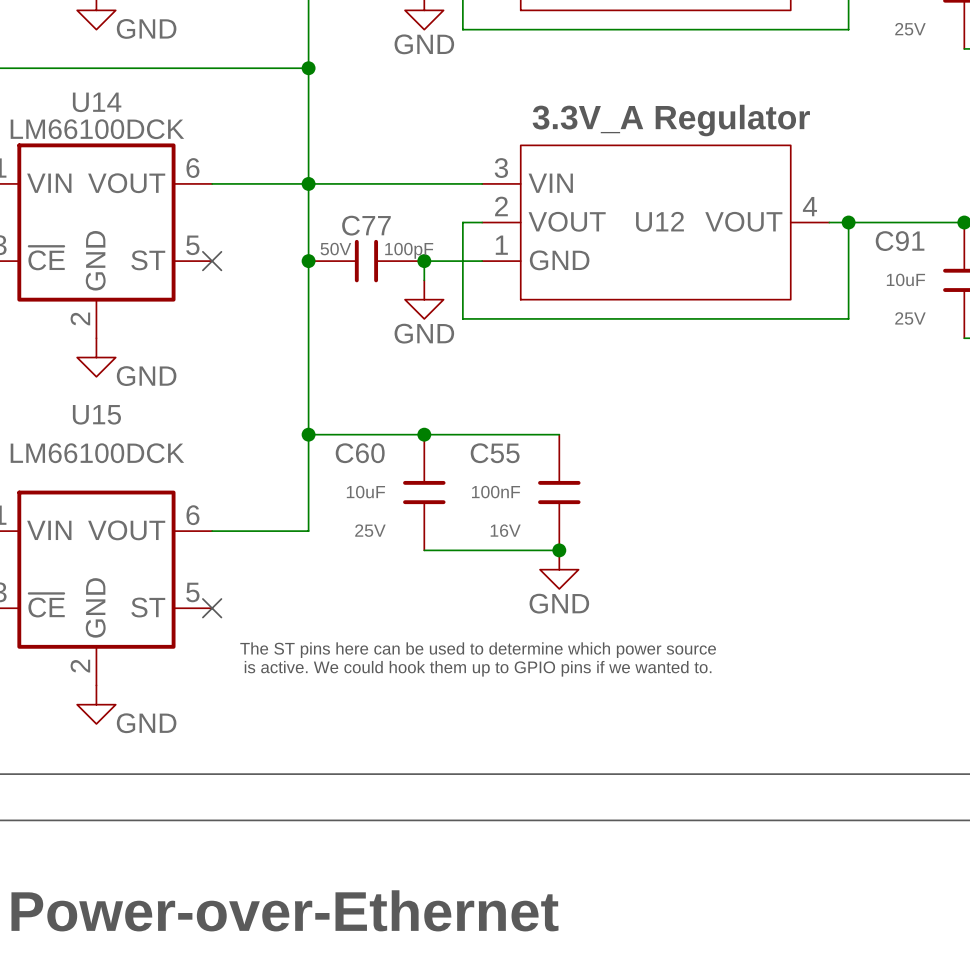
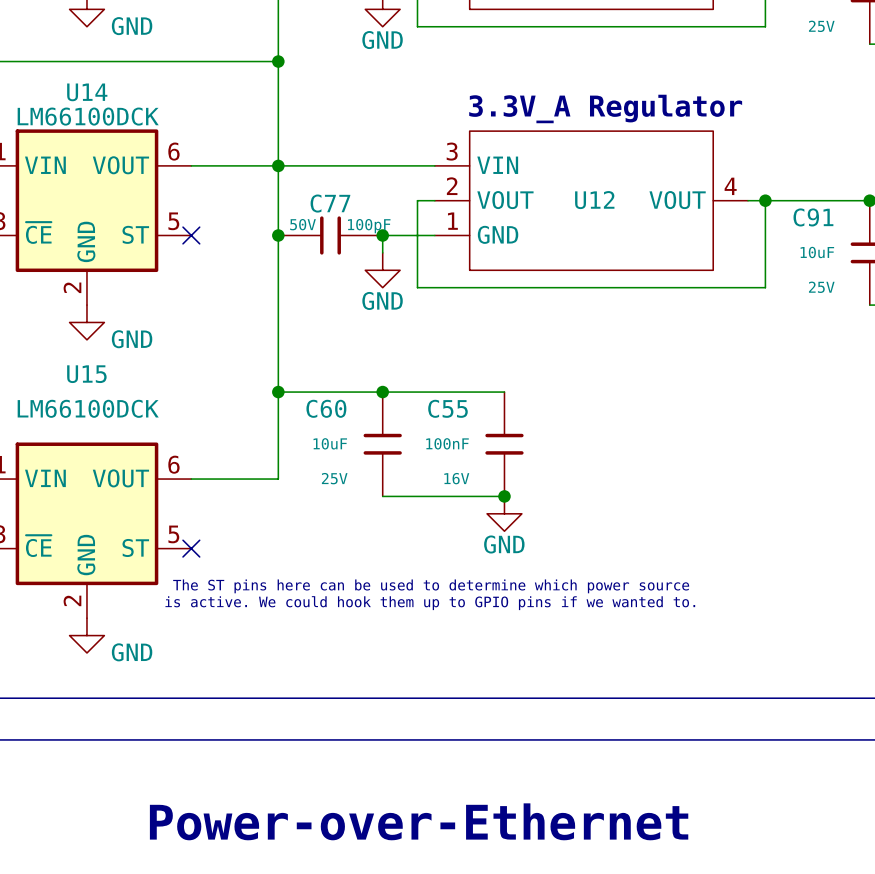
text position: Power-over-Ethernet (284, 910) -> Power-over-Ethernet (419, 821)

